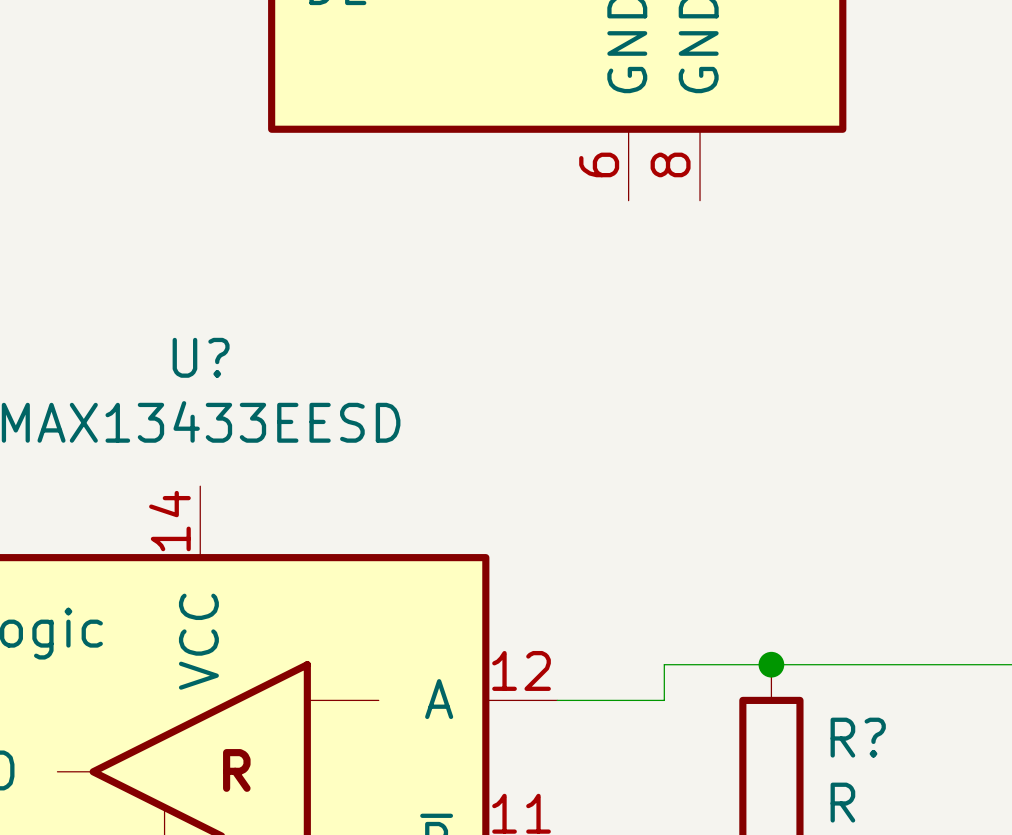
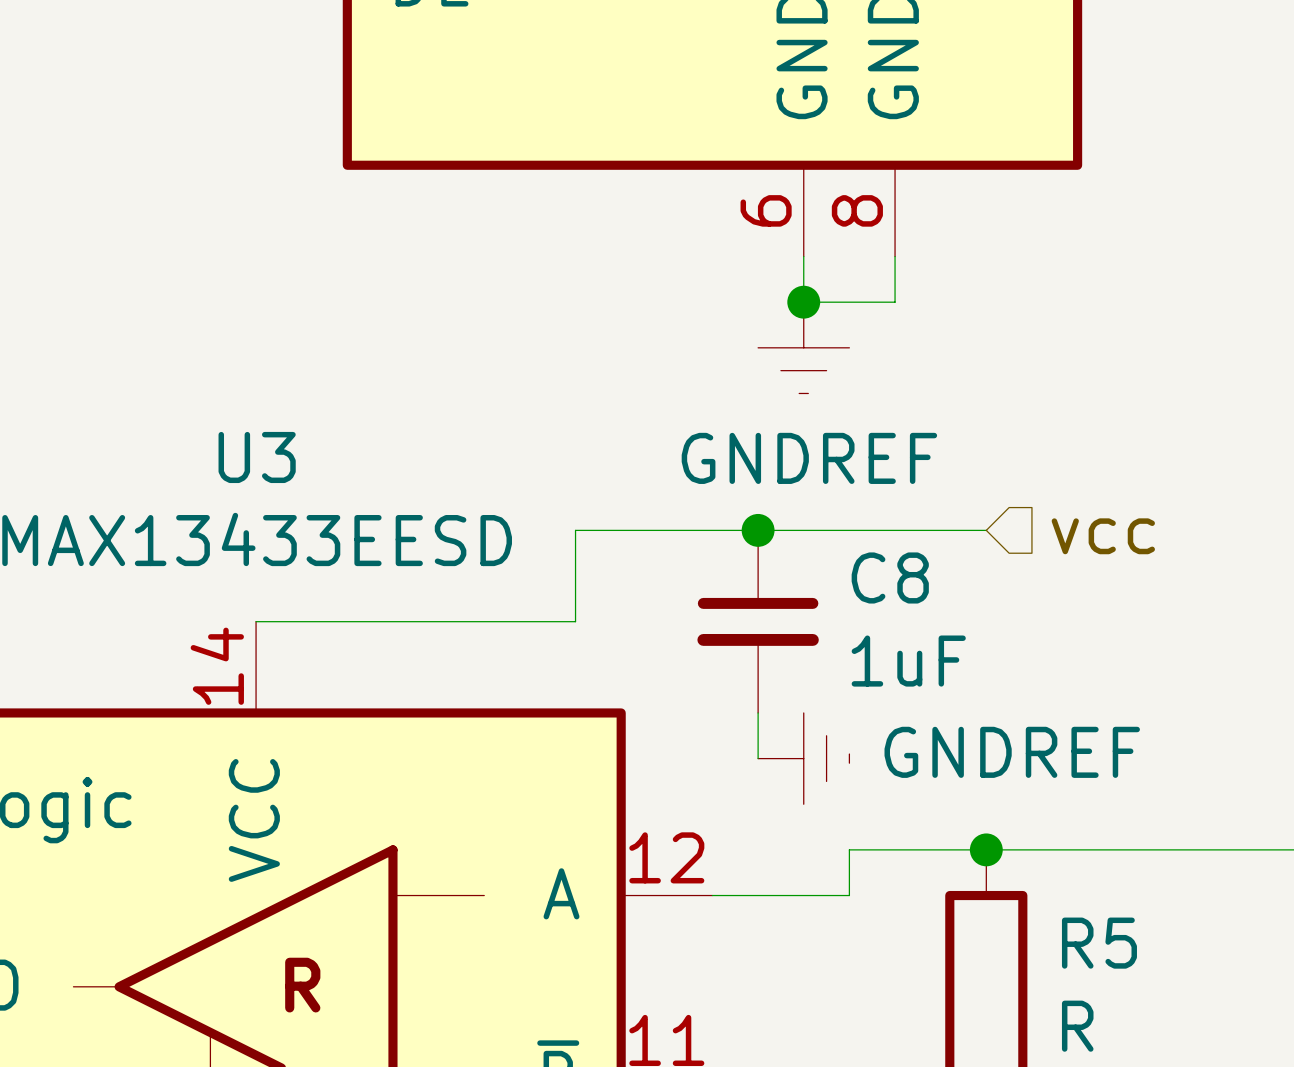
wire: none -> (803, 256) (803, 302) (895, 302) (895, 256)
junction: none -> (803, 302)
power symbol: none -> GNDREF (803, 347)
U? name: U? (201, 357) -> U3 (257, 457)
junction: none -> (758, 530)
wire: none -> (986, 530) (575, 530) (575, 621) (256, 621)
hierarchical label: none -> vcc (1103, 536)
C8: none -> 1uF (758, 621)
wire: none -> (758, 712) (758, 758)
power symbol: none -> GNDREF (803, 758)
R? name: R? (858, 737) -> R5 (1099, 943)

